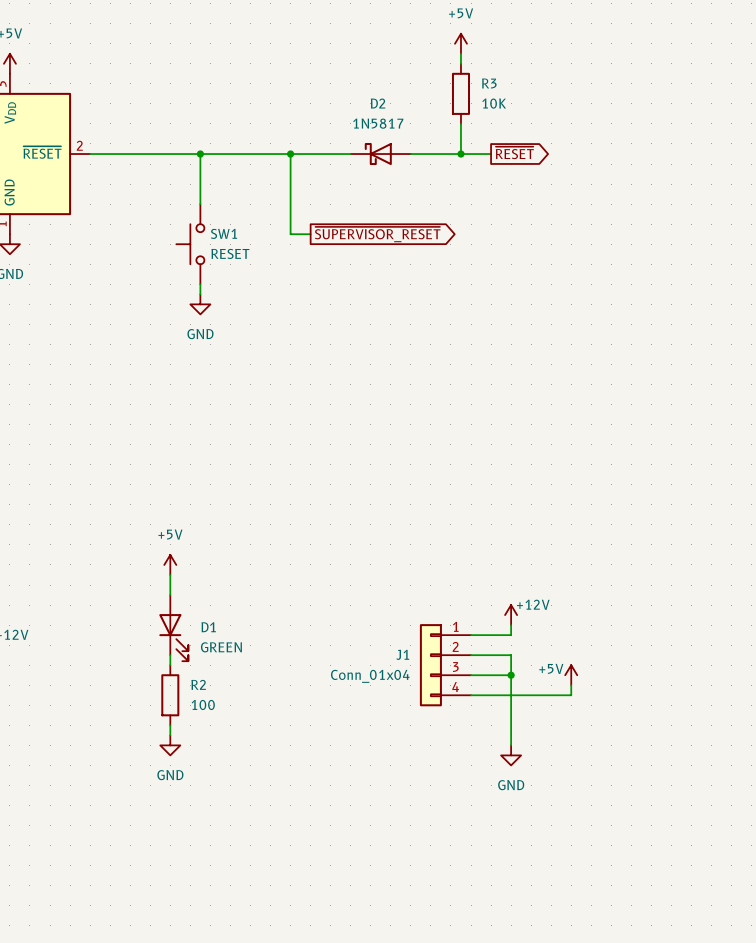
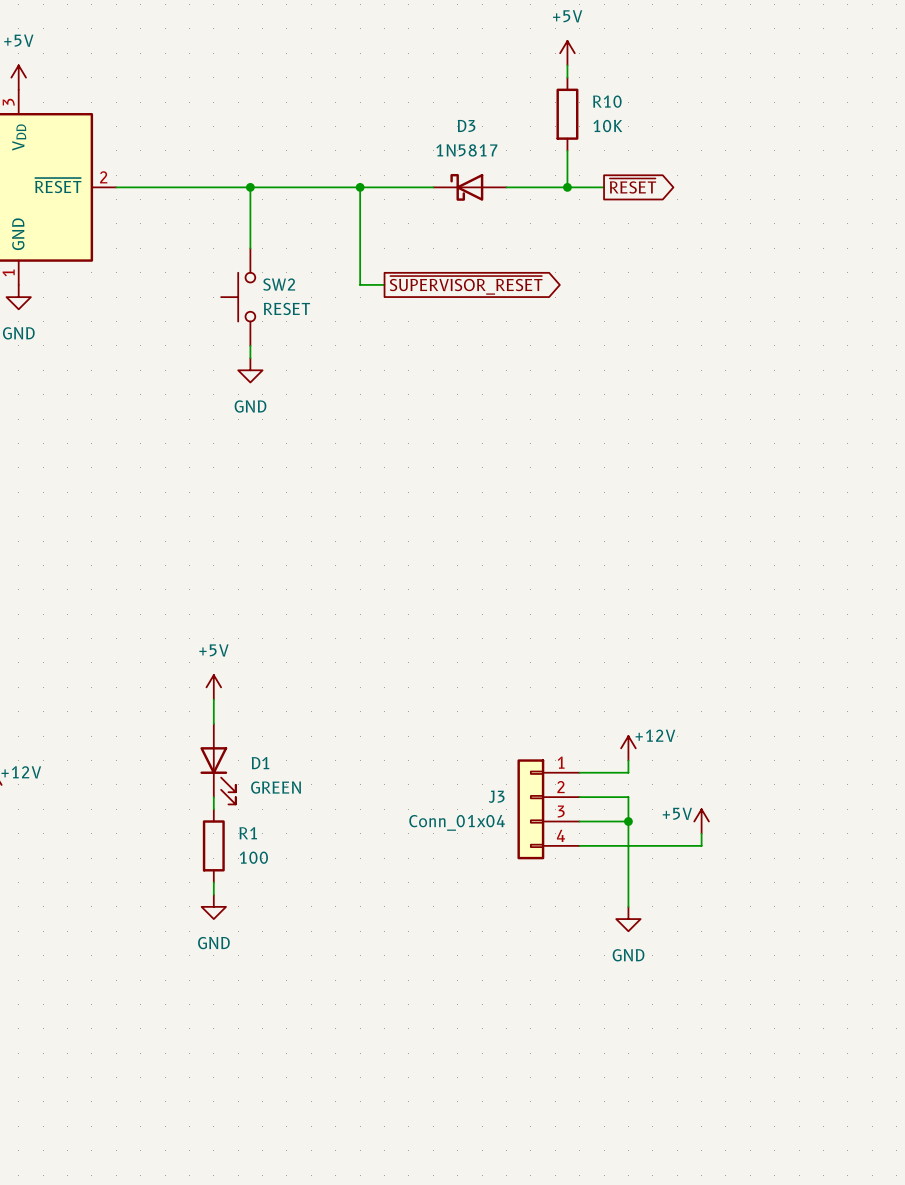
R3 name: R3 (489, 83) -> R10 (607, 101)
D2 name: D2 (378, 103) -> D3 (466, 125)
SW1 name: SW1 (224, 233) -> SW2 (279, 284)
J1 name: J1 (402, 654) -> J3 (496, 796)
R2 name: R2 (198, 684) -> R1 (248, 833)

